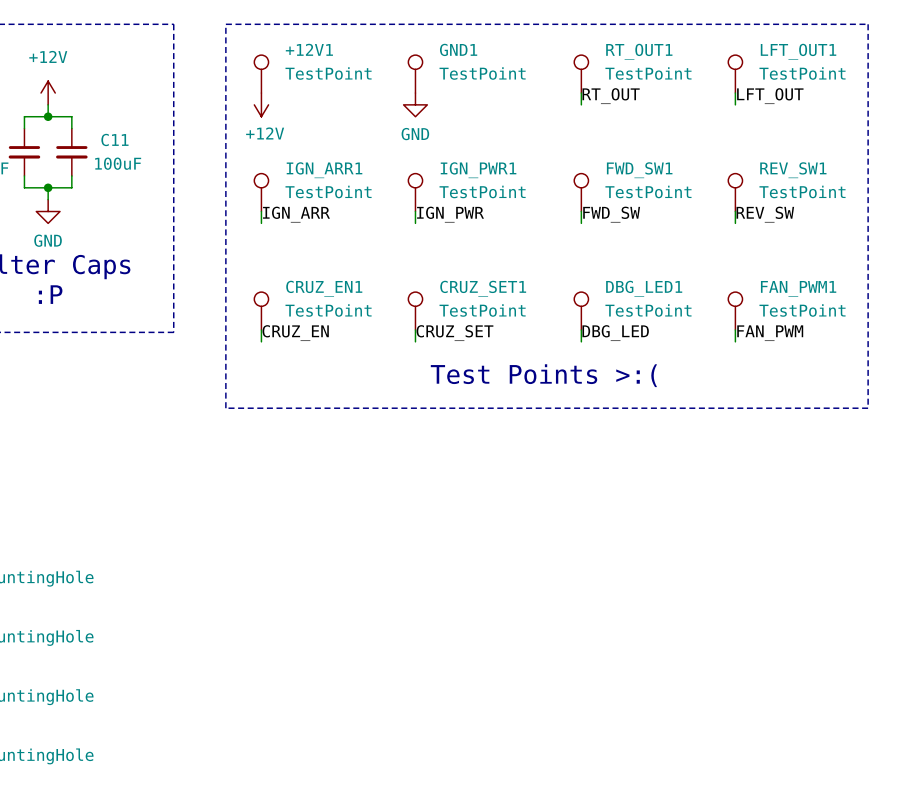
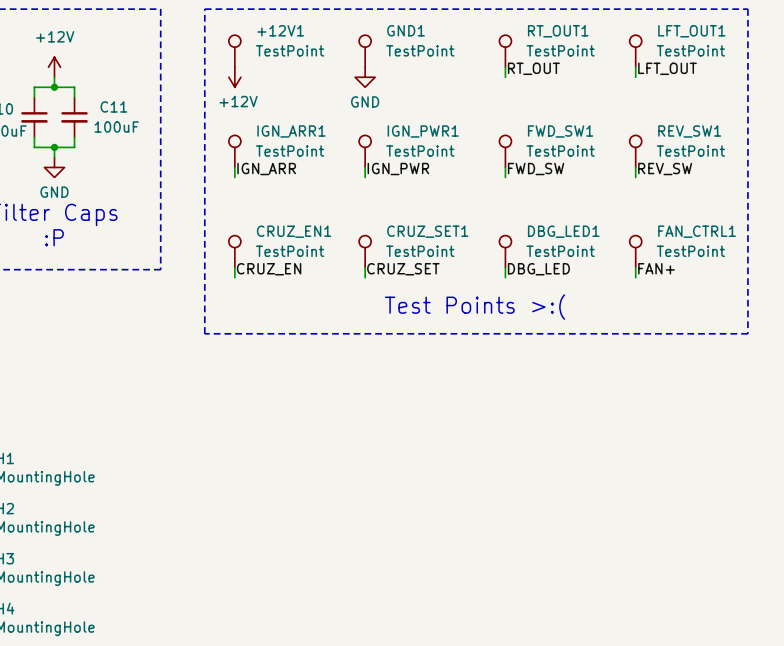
FAN_PWM1 name: FAN_PWM1 (798, 288) -> FAN_CTRL1 (697, 231)
label: FAN_PWM (770, 333) -> FAN+ (656, 268)

